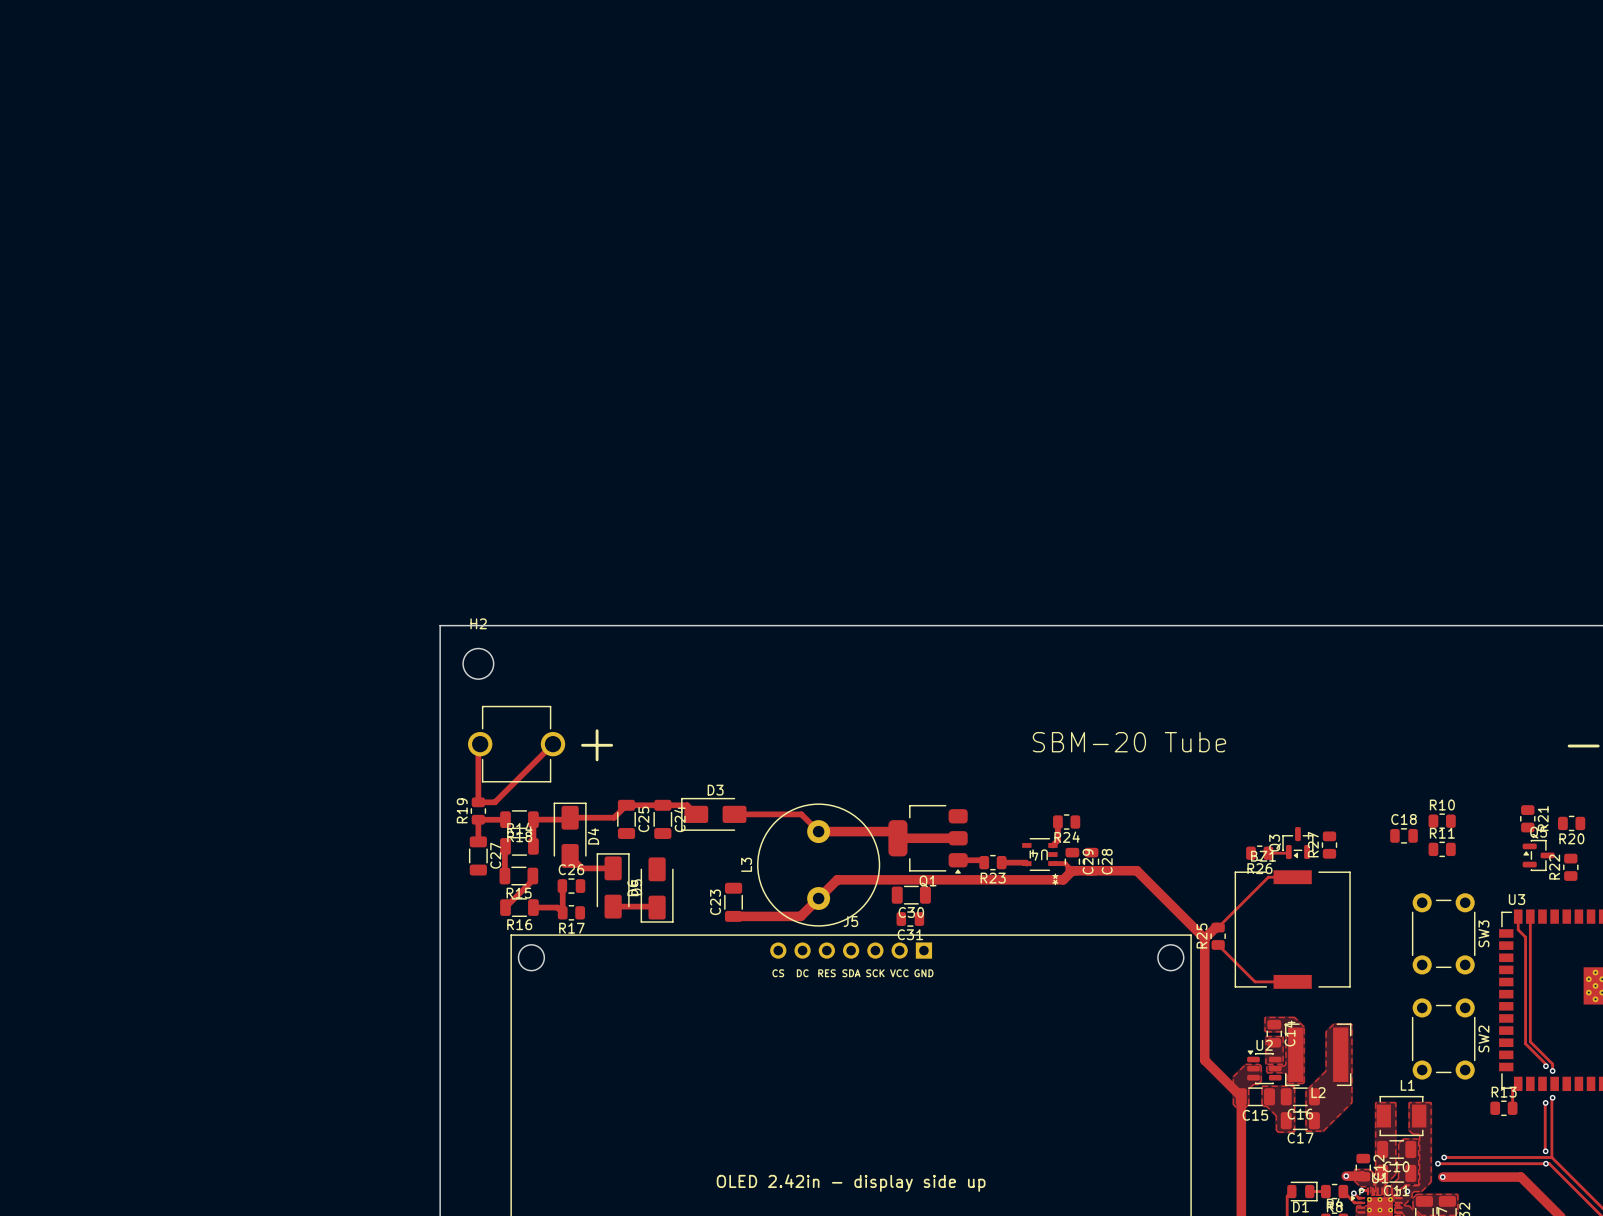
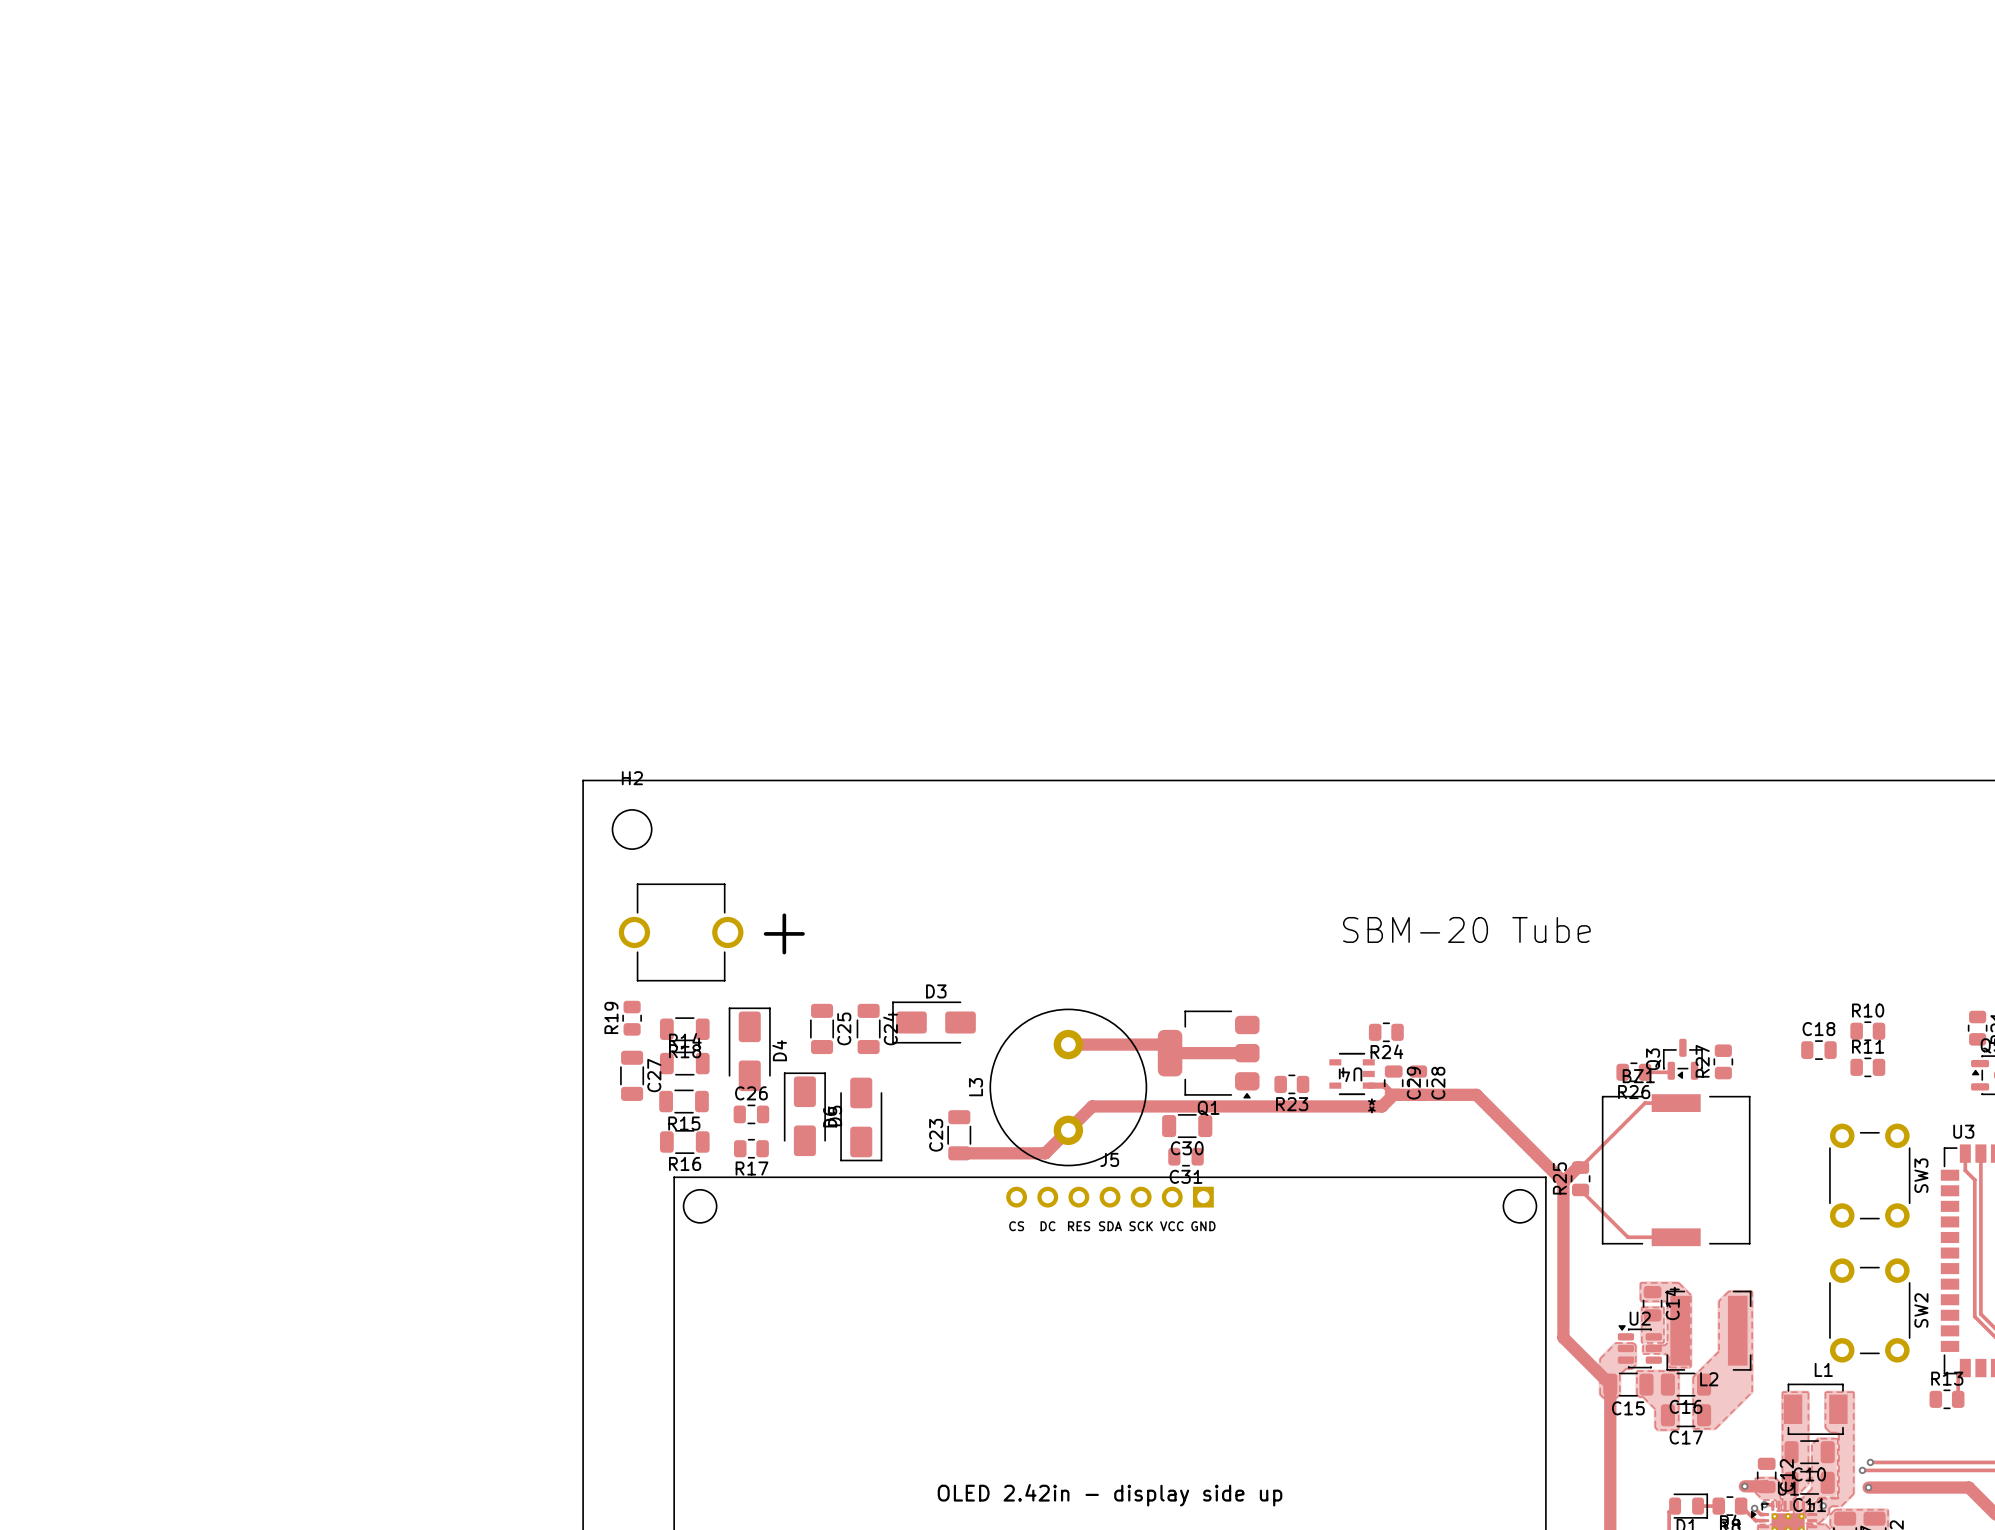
track: (480, 744) (478, 745) (478, 802) (494, 802) (553, 744) -> none
track: (696, 814) (687, 805) (626, 805) (614, 817) (533, 819) (533, 846) -> none
track: (734, 814) (801, 814) (818, 831) -> none
track: (505, 819) (478, 819) (478, 841) -> none
track: (1057, 822) (1057, 840) (1052, 845) -> none
track: (505, 846) (504, 876) -> none
track: (570, 855) (582, 868) (613, 868) -> none
track: (958, 860) (981, 860) (984, 862) -> none
track: (1001, 862) (1026, 863) -> none
track: (532, 876) (532, 880) (505, 907) -> none
track: (562, 886) (562, 912) (557, 907) (533, 907) -> none
track: (613, 906) (657, 907) -> none

